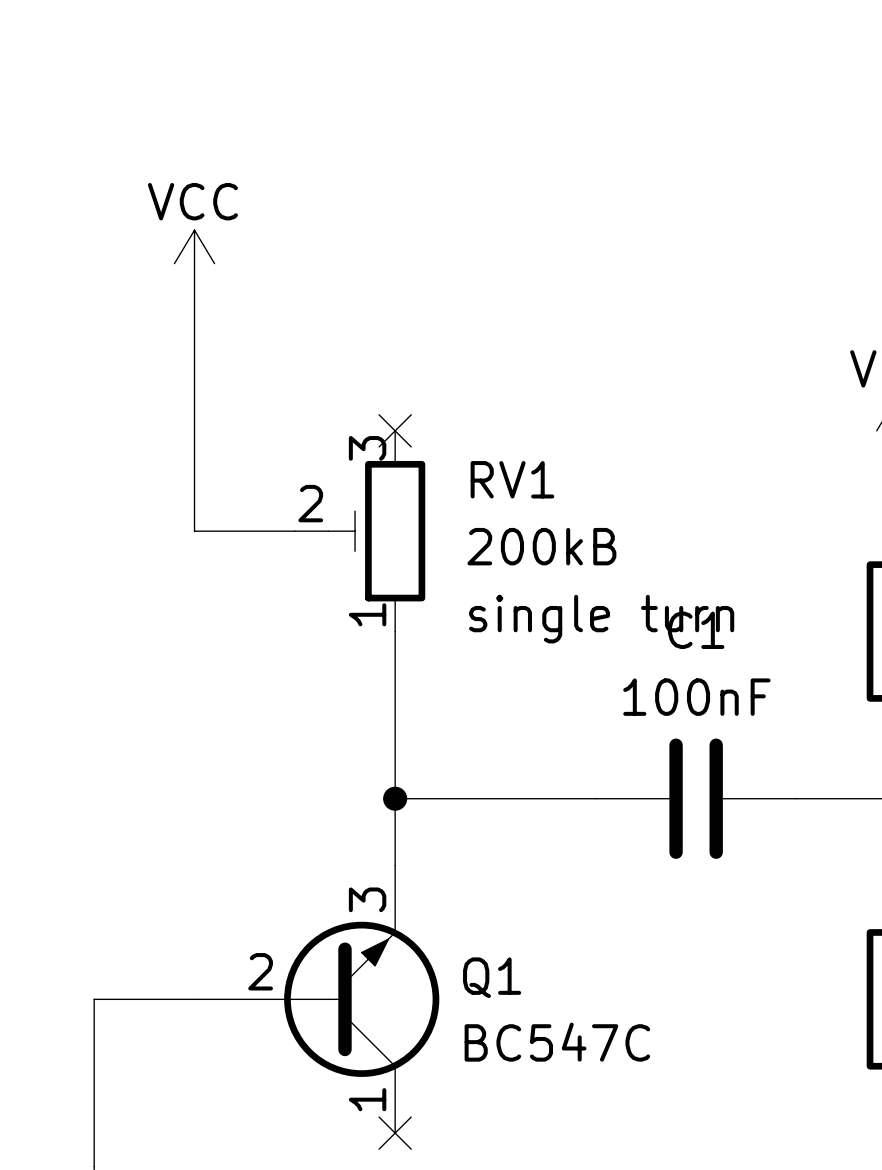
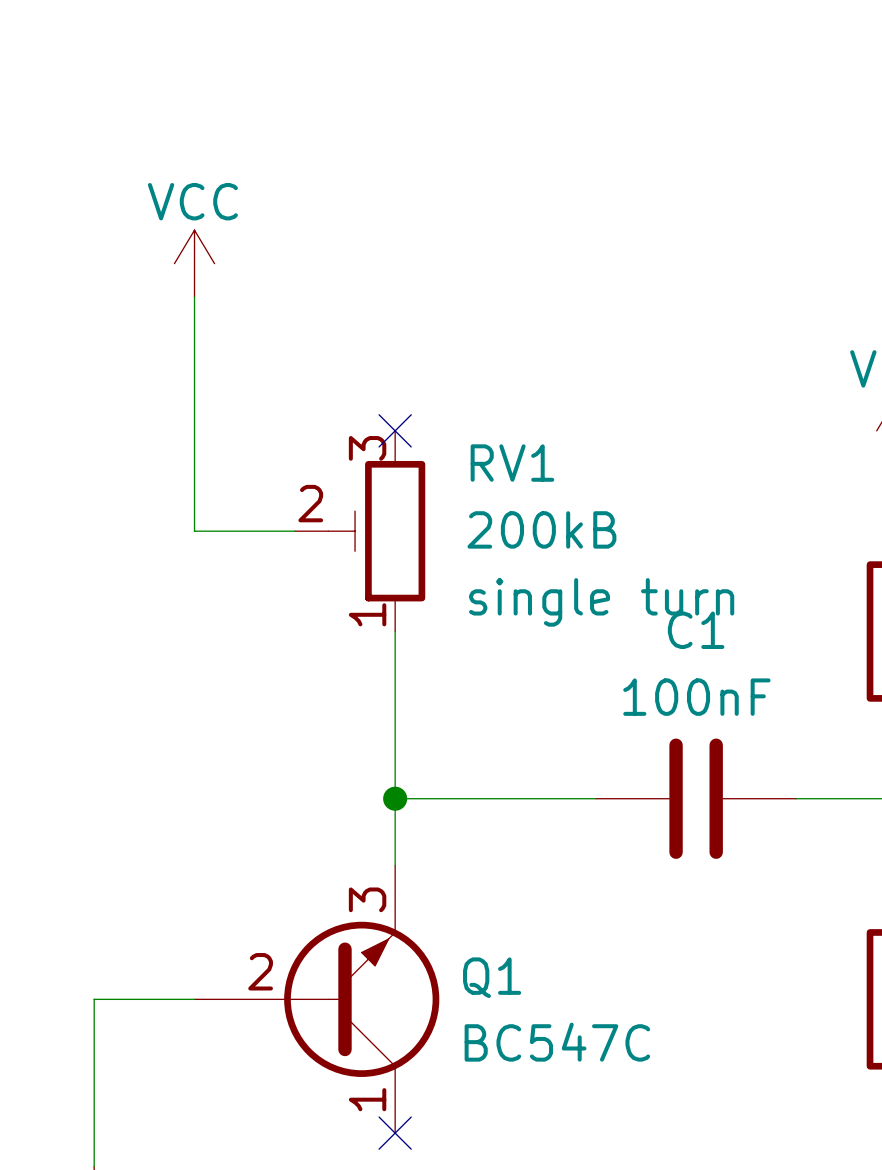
RV1 name position: RV1 (512, 479) -> RV1 (512, 463)
RV1 value position: 200kB (541, 546) -> 200kB (541, 529)
RV1 text position: single turn (601, 619) -> single turn (601, 602)

